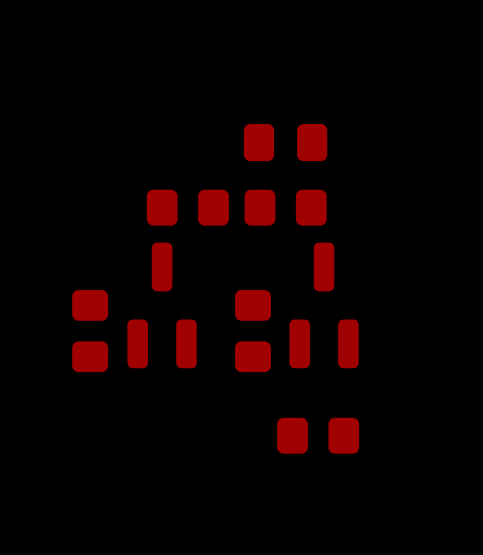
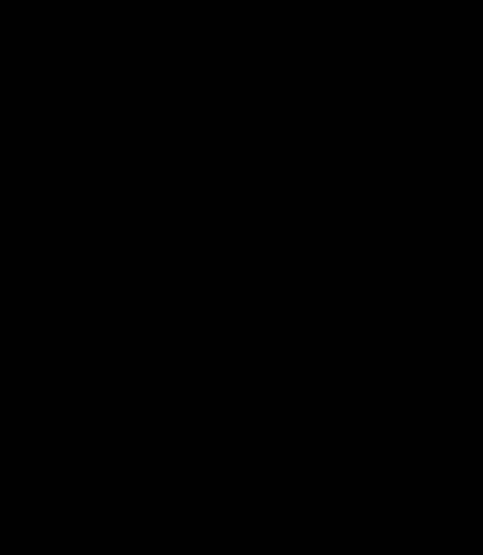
part: (285, 142) -> none
part: (187, 207) -> none
part: (285, 207) -> none
part: (162, 305) -> none
part: (324, 305) -> none
part: (90, 331) -> none
part: (253, 331) -> none
part: (318, 435) -> none

